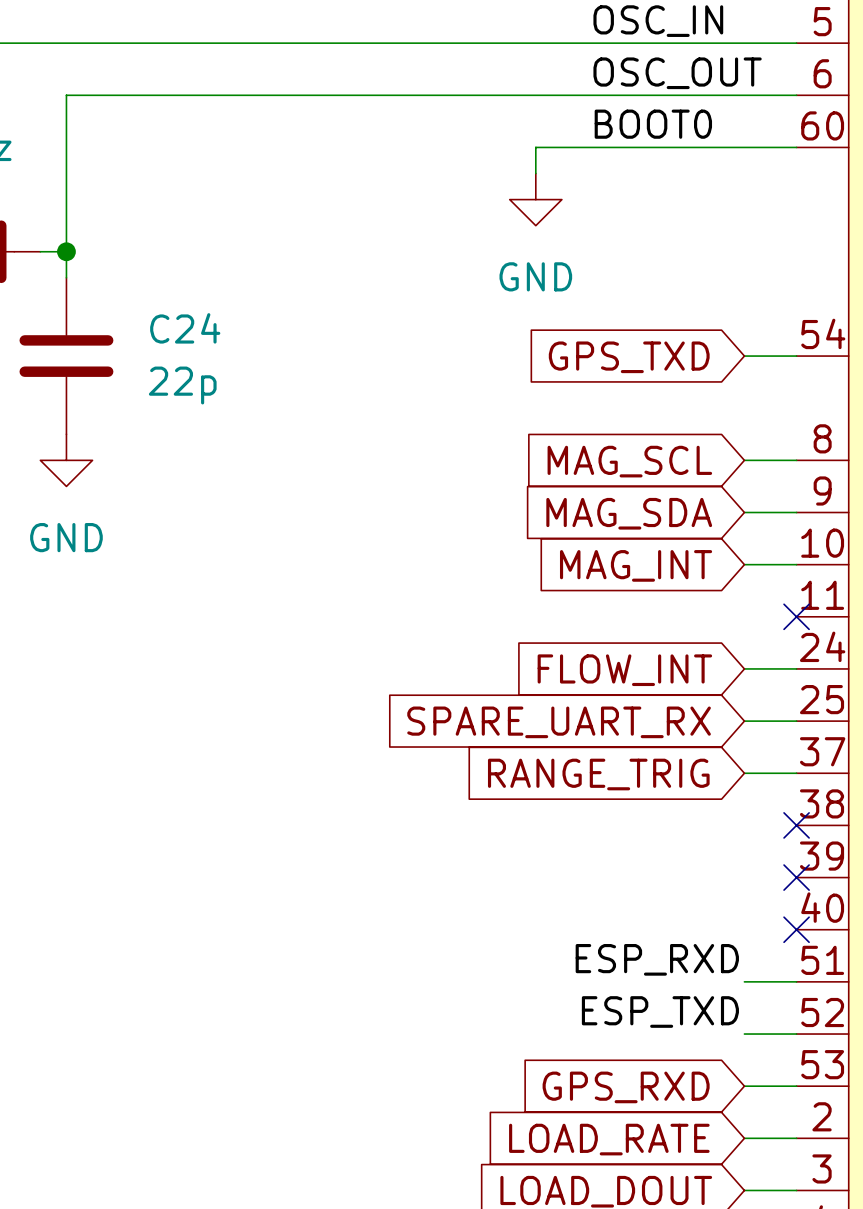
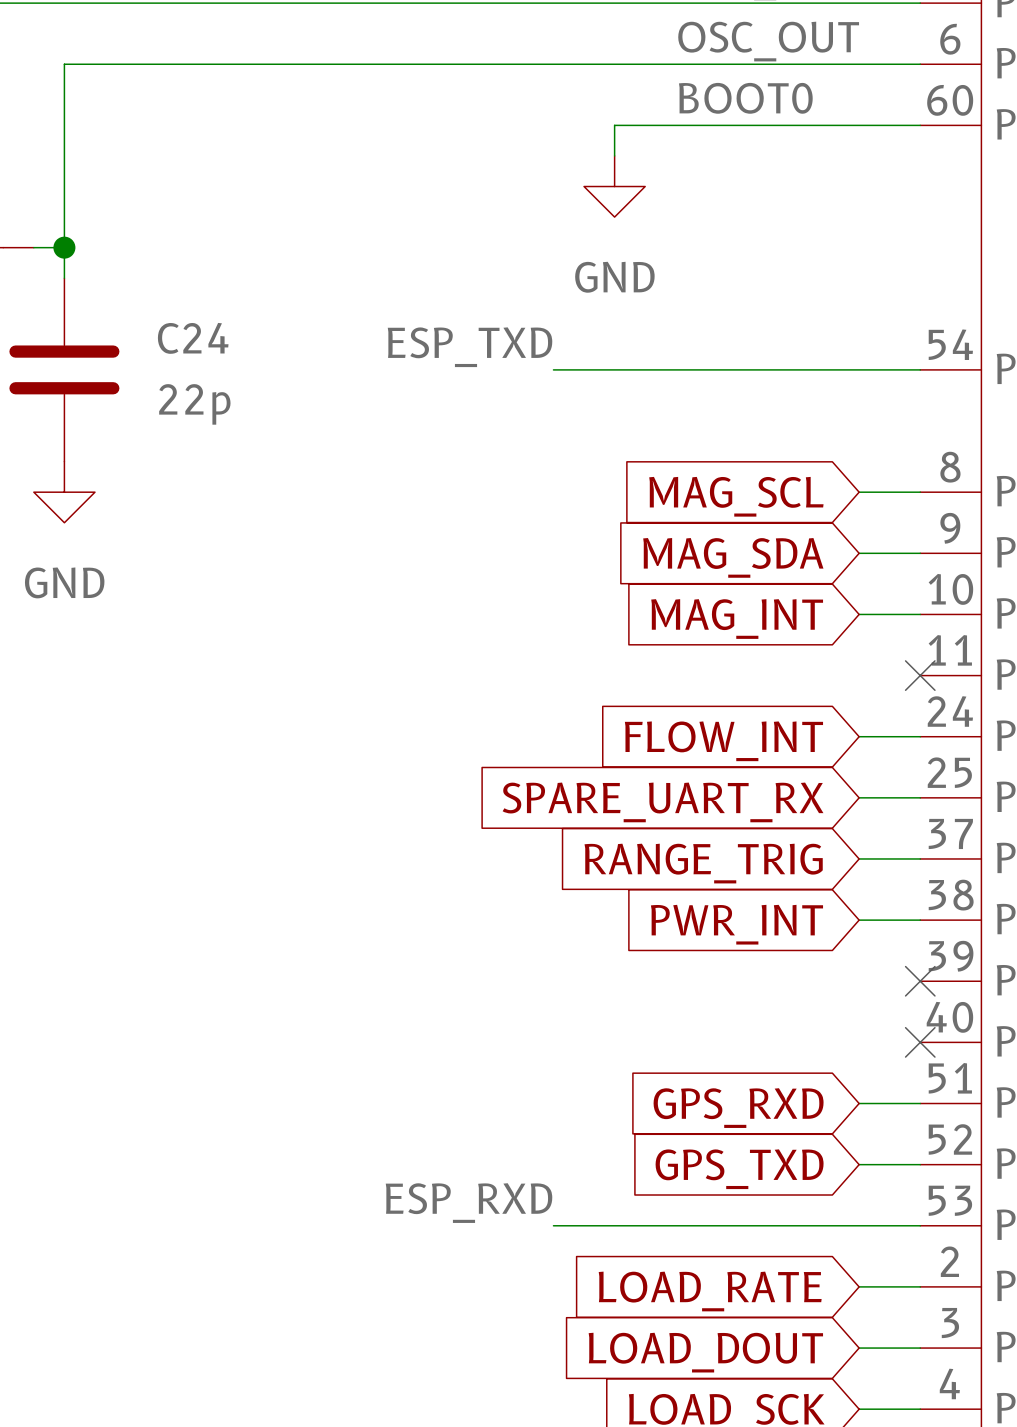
label: none -> ESP_TXD (470, 347)
wire: none -> (553, 369) (859, 369)
global label: GPS_TXD (629, 357) -> none
wire: none -> (859, 920) (920, 920)
no-connect mark: (796, 825) -> none
global label: none -> PWR_INT (736, 924)
label position: ESP_RXD (657, 959) -> ESP_RXD (469, 1203)
label: ESP_TXD (660, 1011) -> none
global label: none -> GPS_TXD (739, 1169)
wire: none -> (553, 1225) (859, 1225)
global label position: GPS_RXD (626, 1087) -> GPS_RXD (738, 1108)

